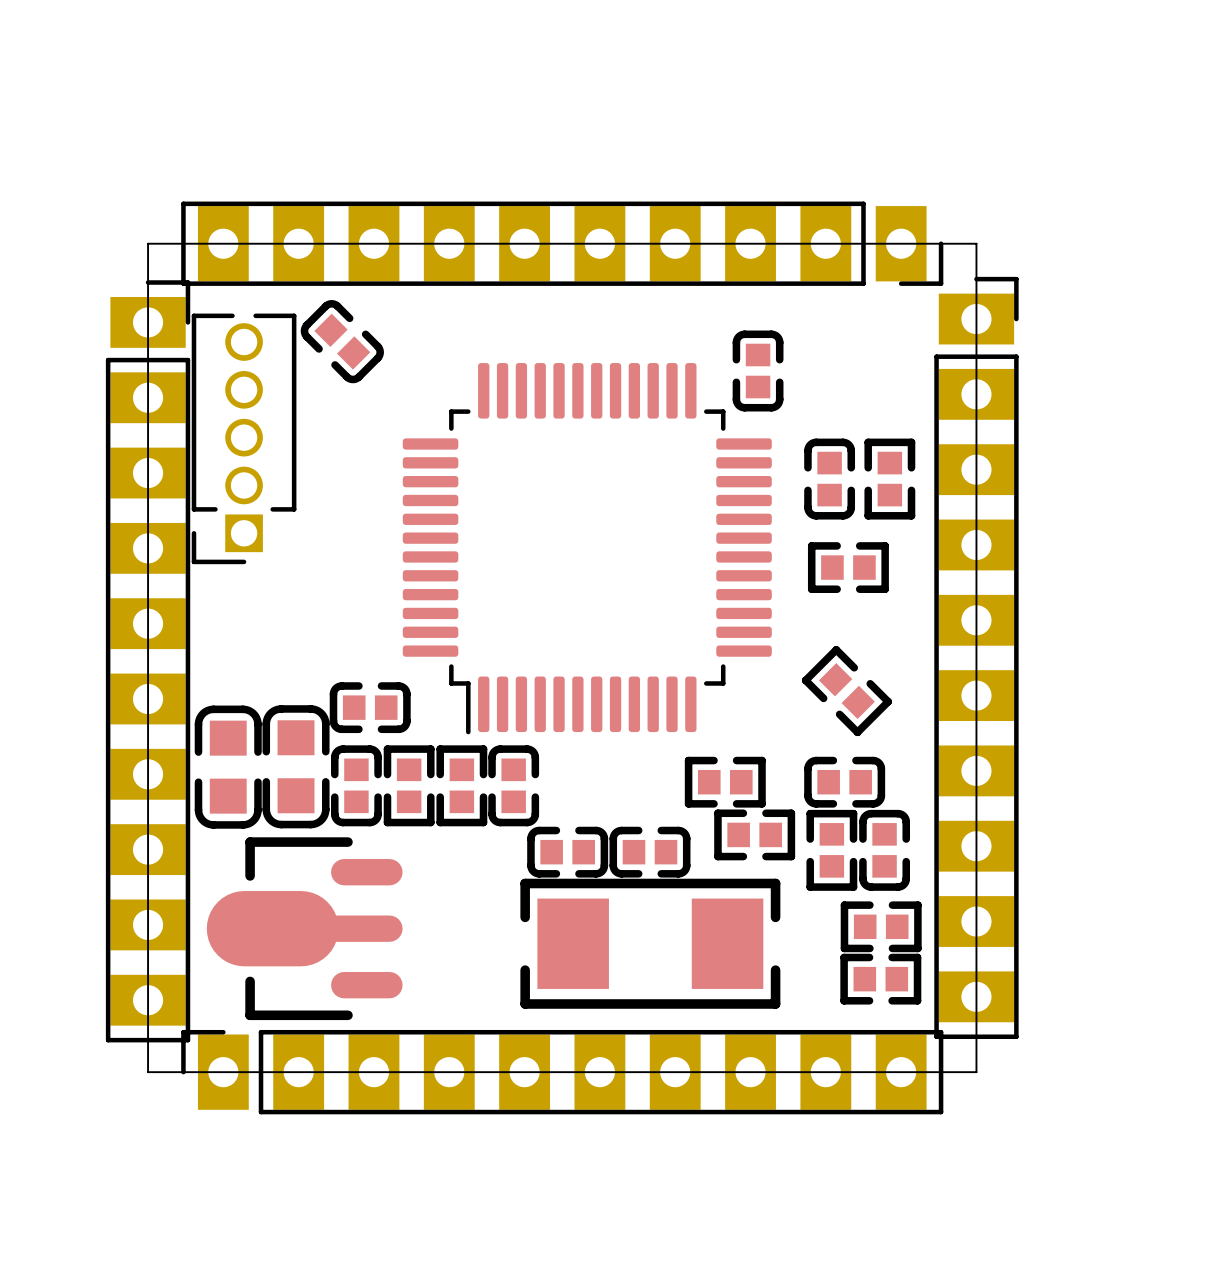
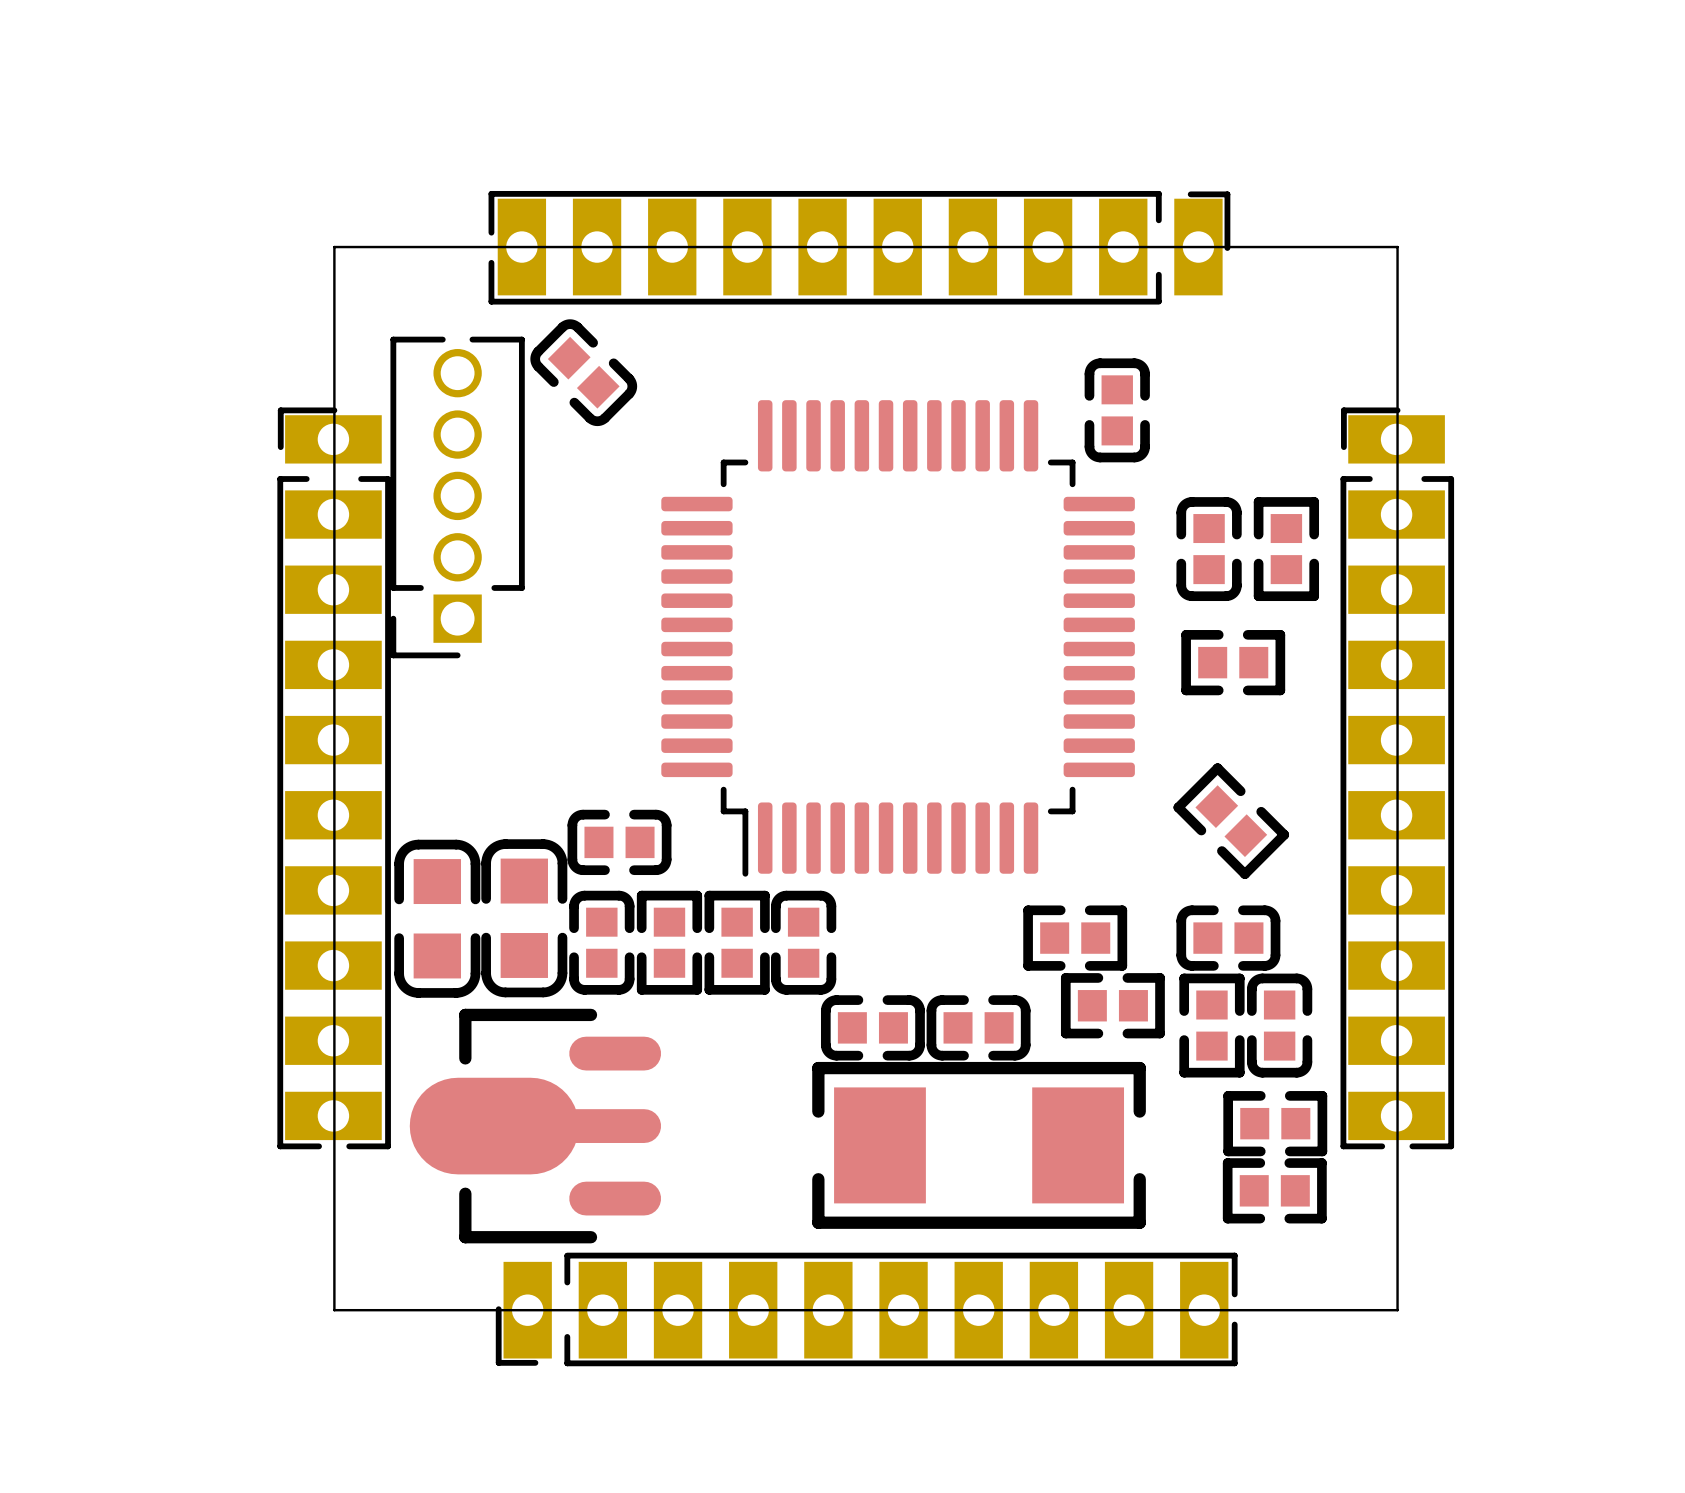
part footprint: [181, 201, 944, 286] -> [488, 190, 1231, 305]
part footprint: [934, 276, 1019, 1040] -> [1340, 407, 1455, 1150]
part footprint: [105, 280, 191, 1043] -> [277, 407, 391, 1150]
part footprint: [181, 1029, 944, 1115] -> [495, 1252, 1238, 1367]

